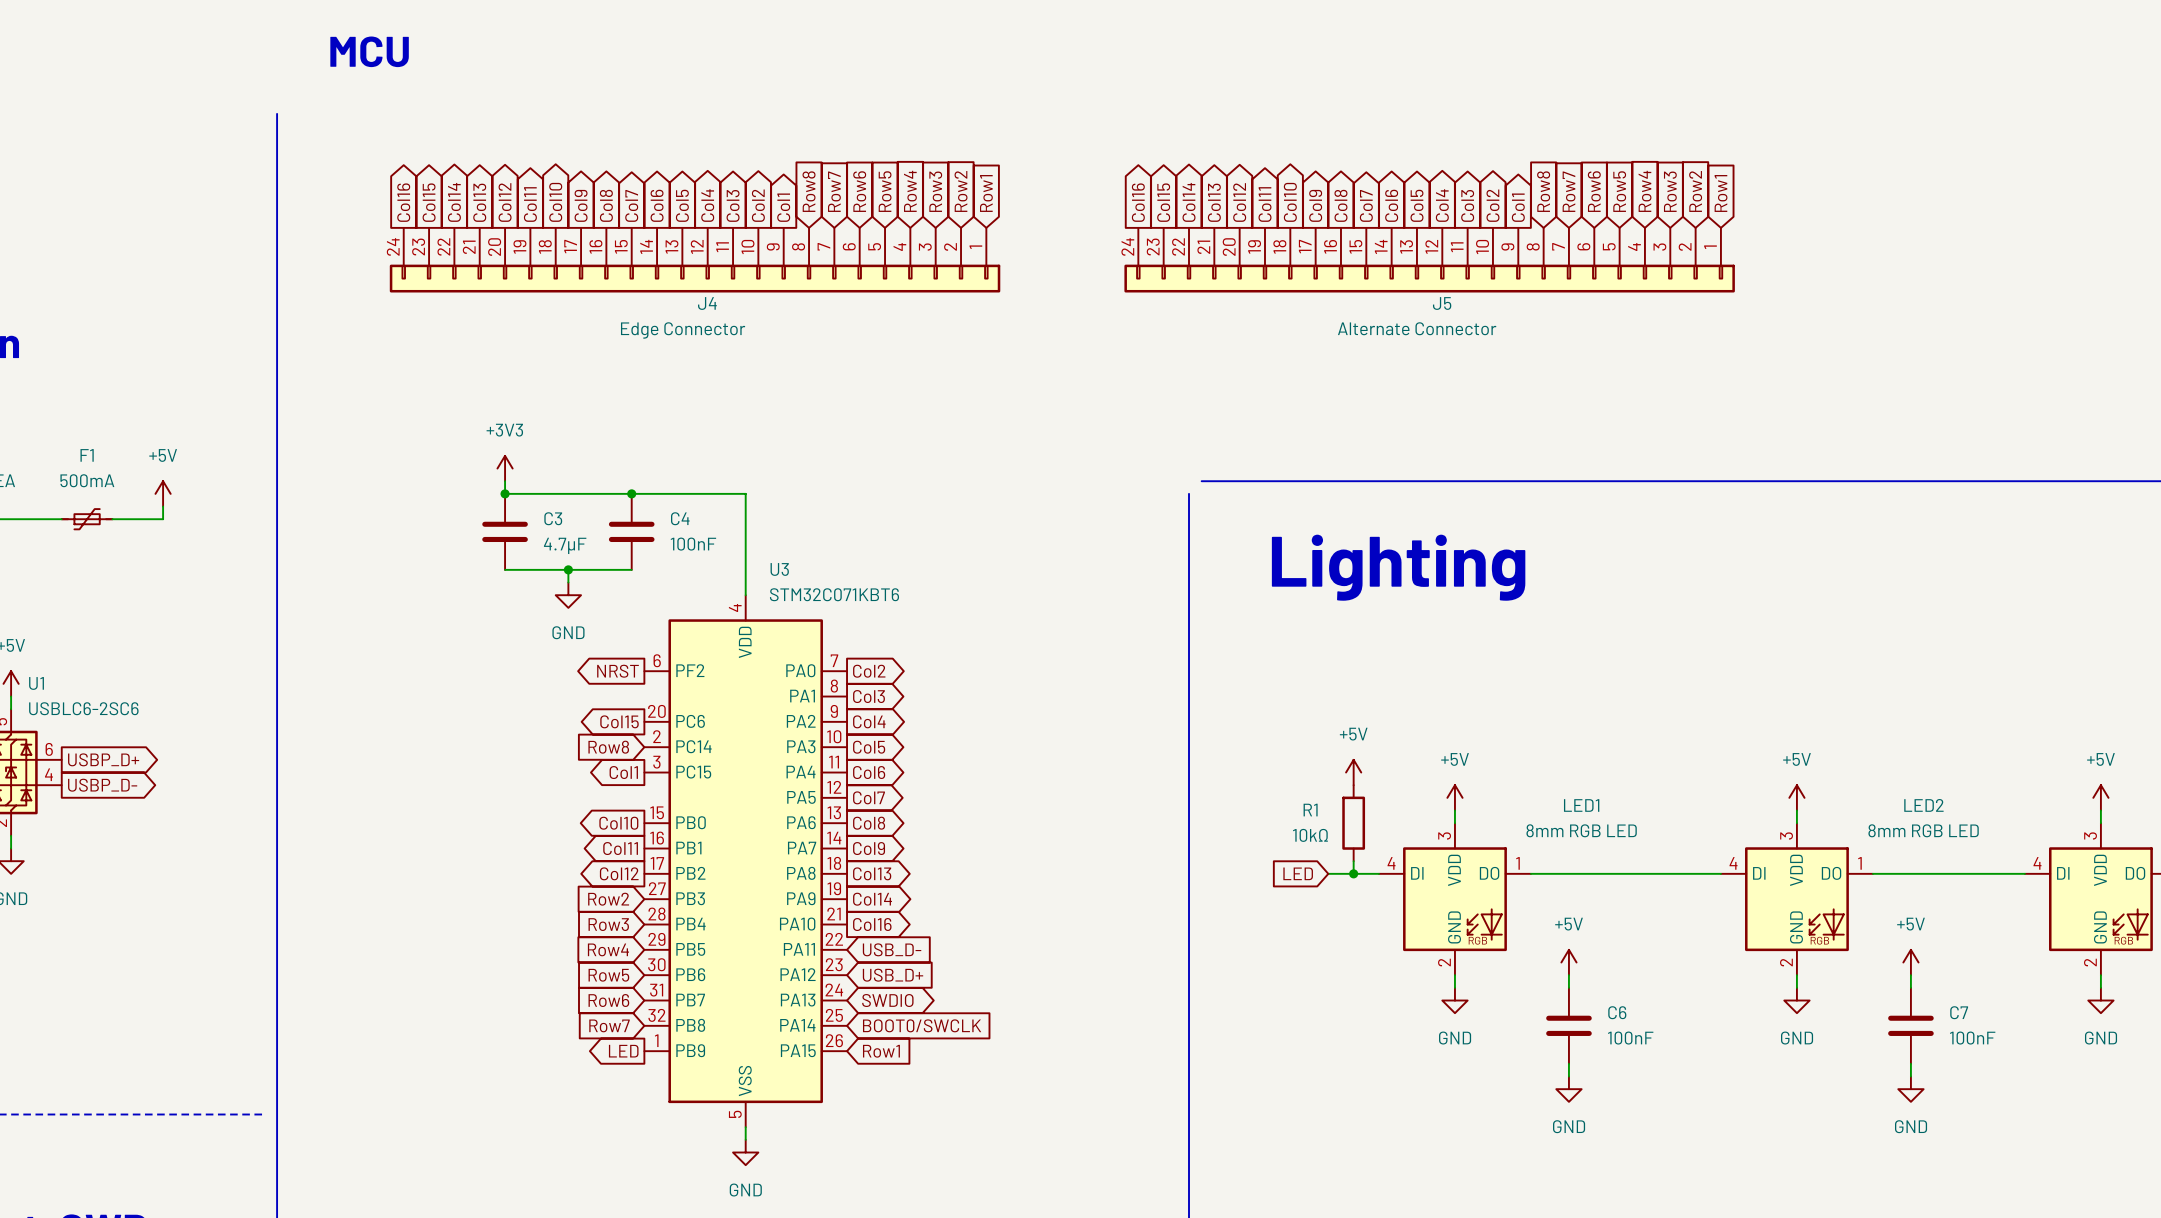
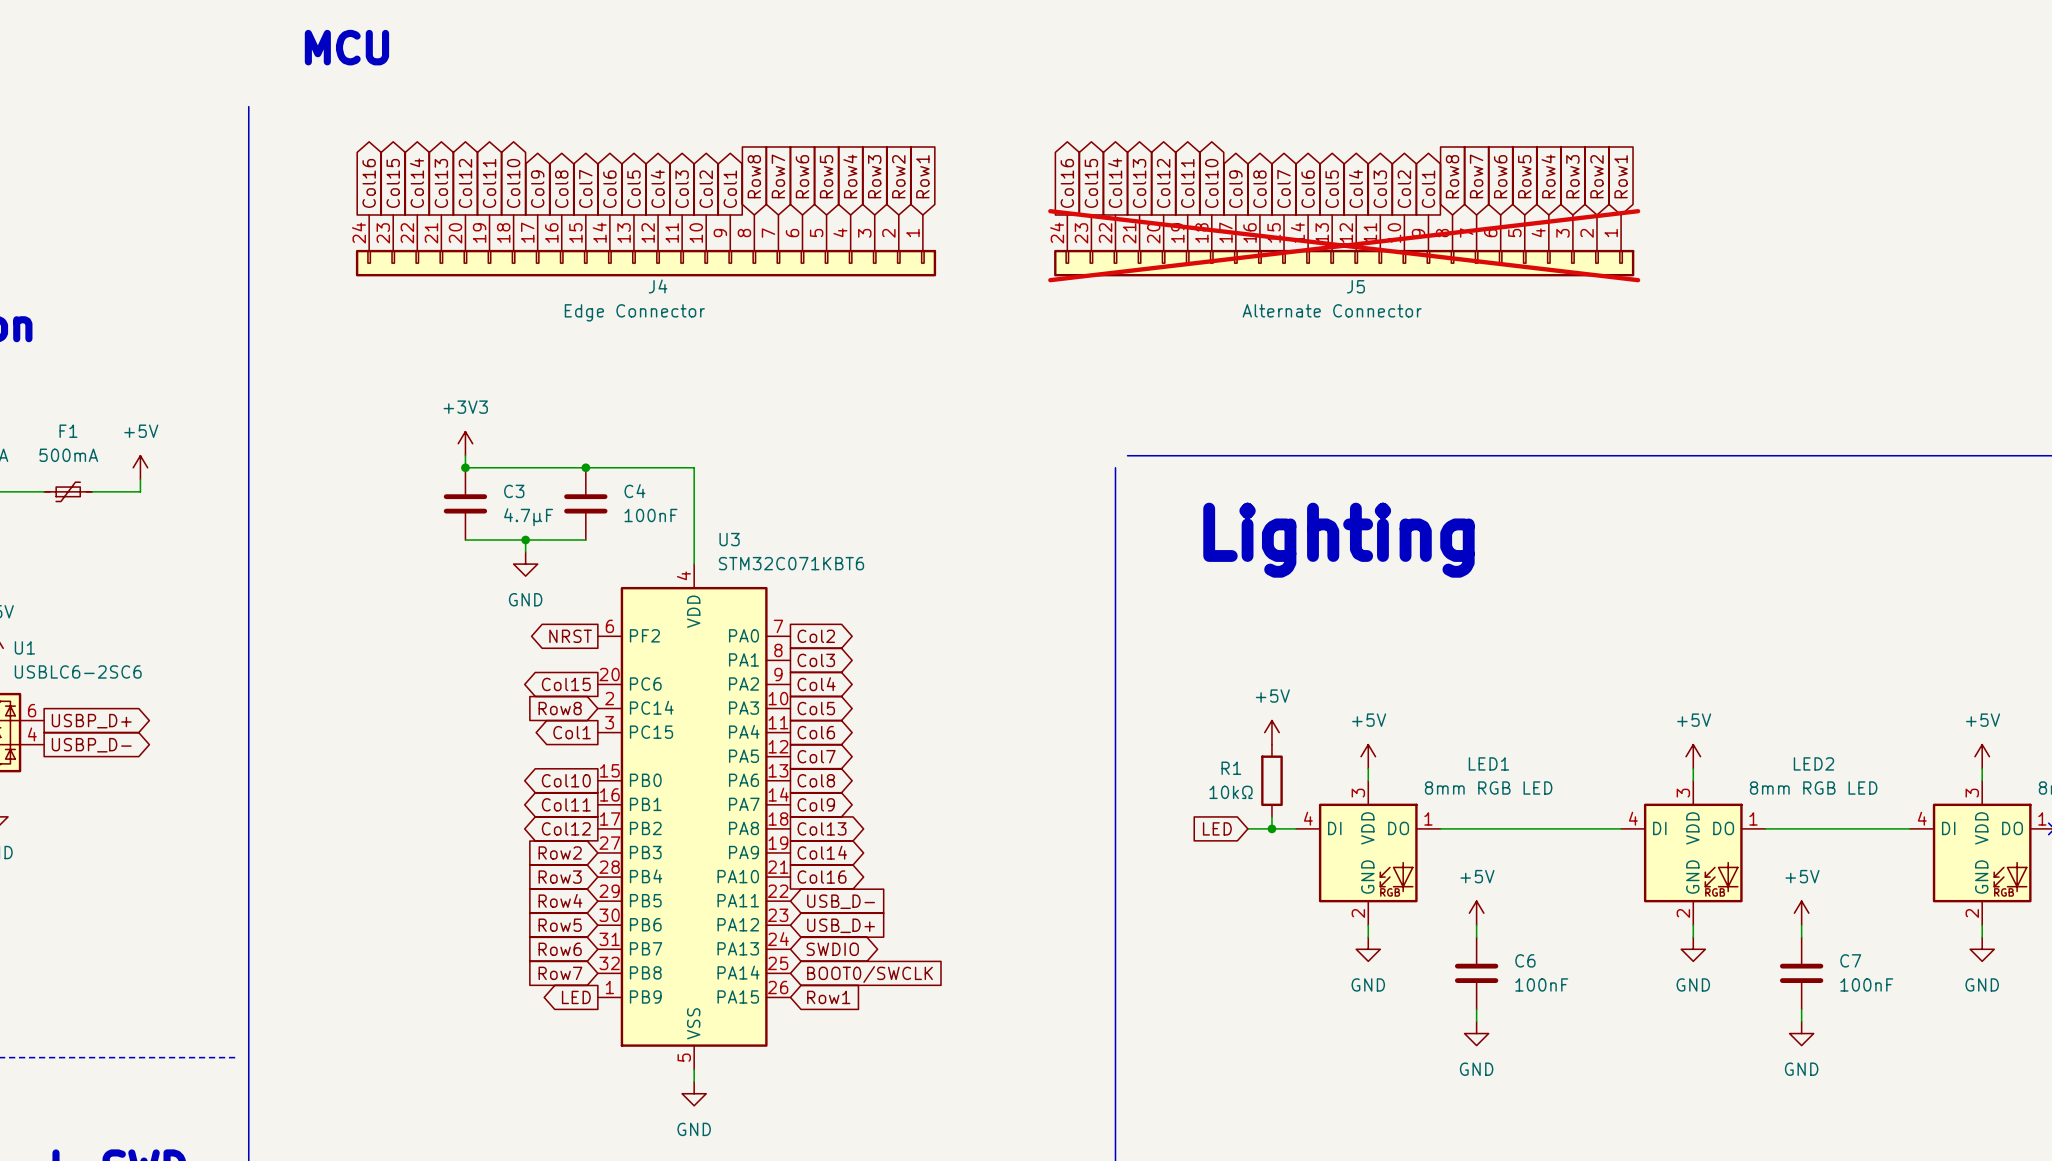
J5 do-not-place cross: none -> (1344, 245)

